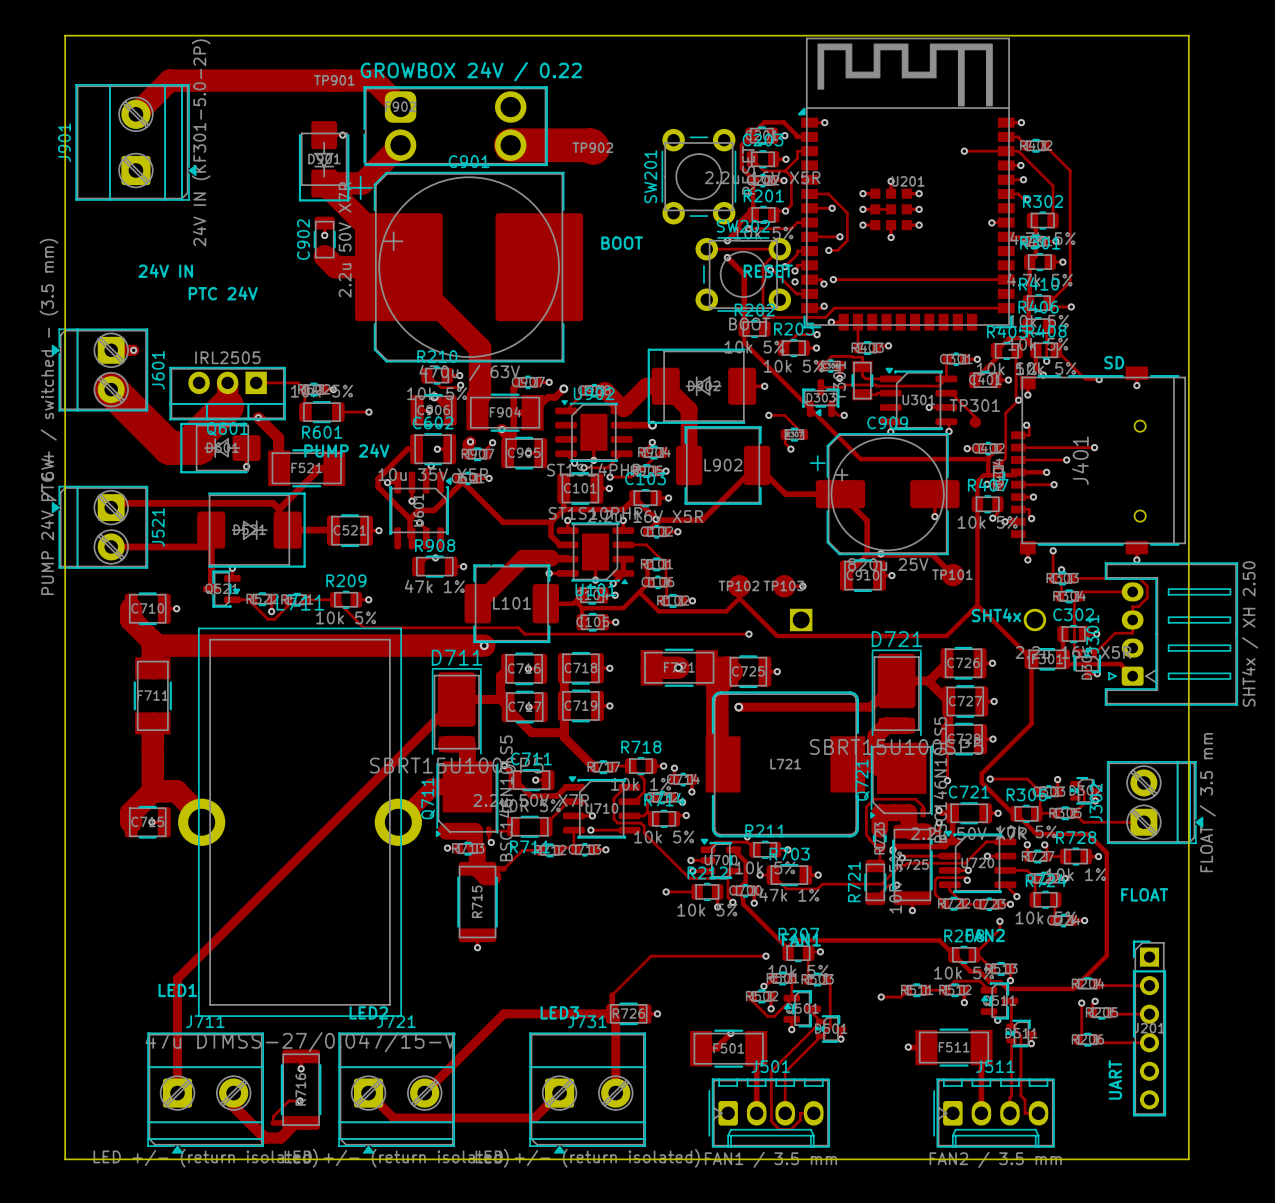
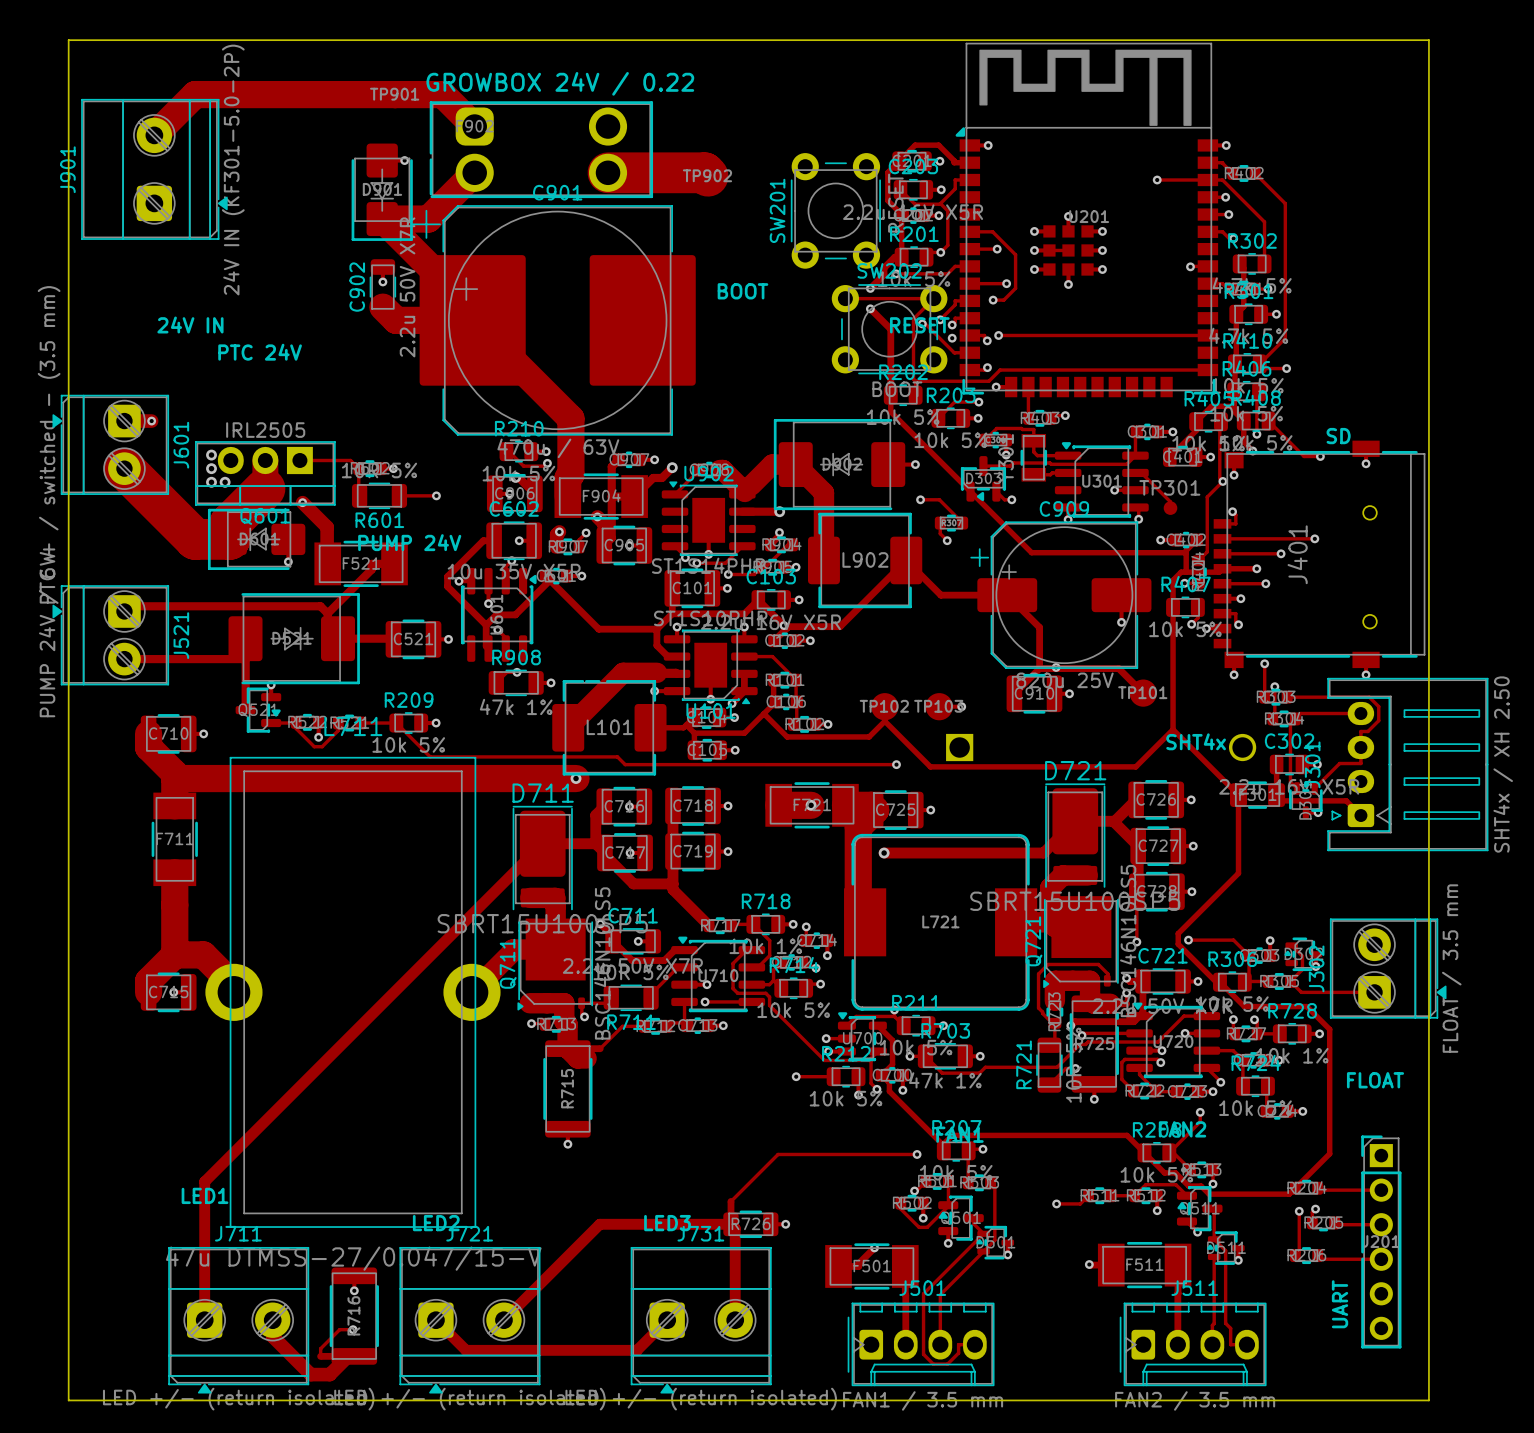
via: none -> (211, 455)
via: none -> (211, 468)
via: none -> (211, 482)
via: none -> (225, 482)

